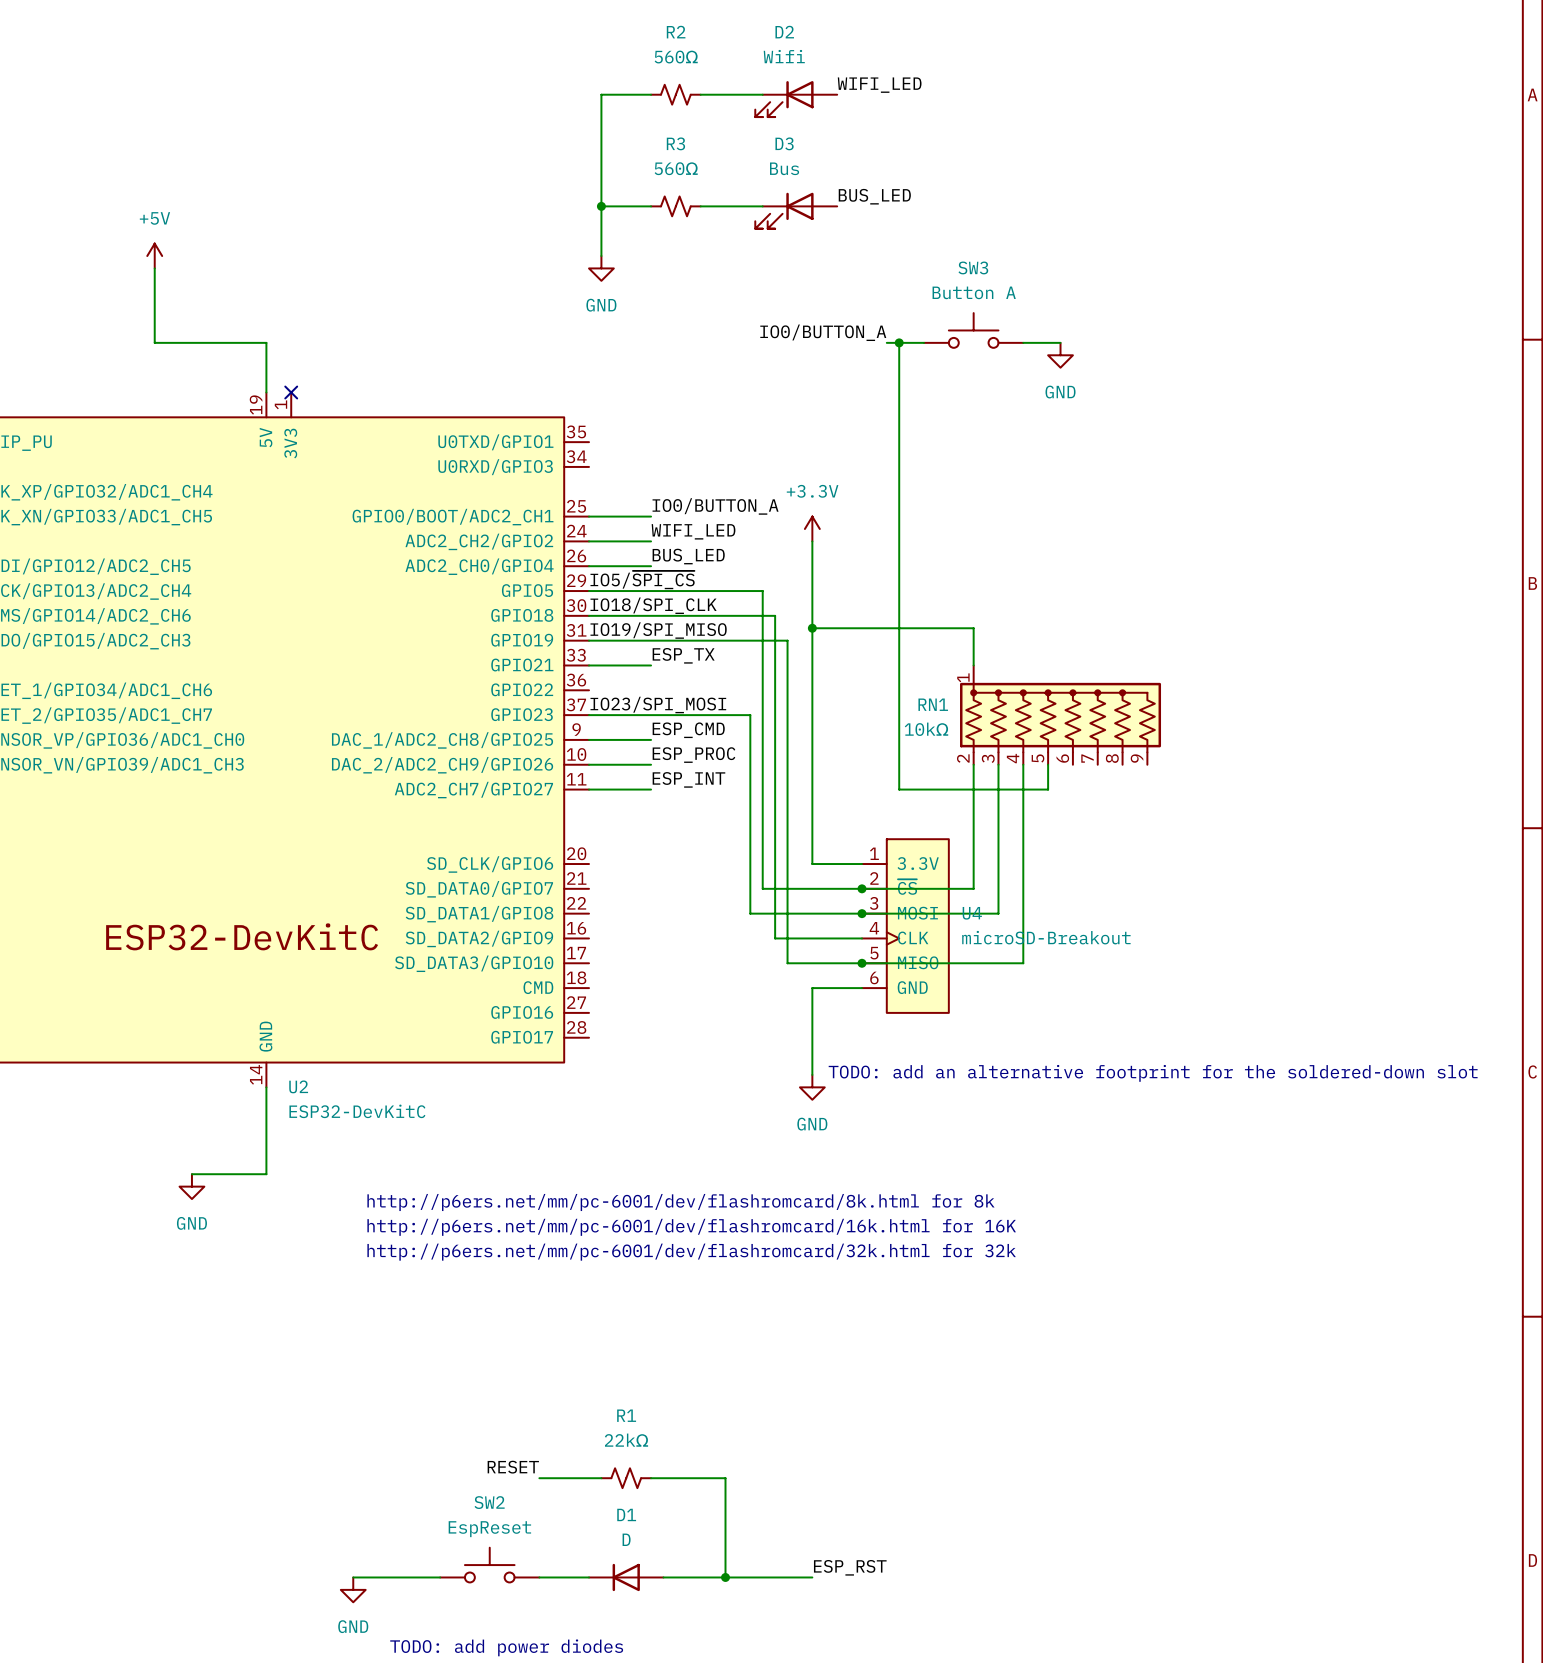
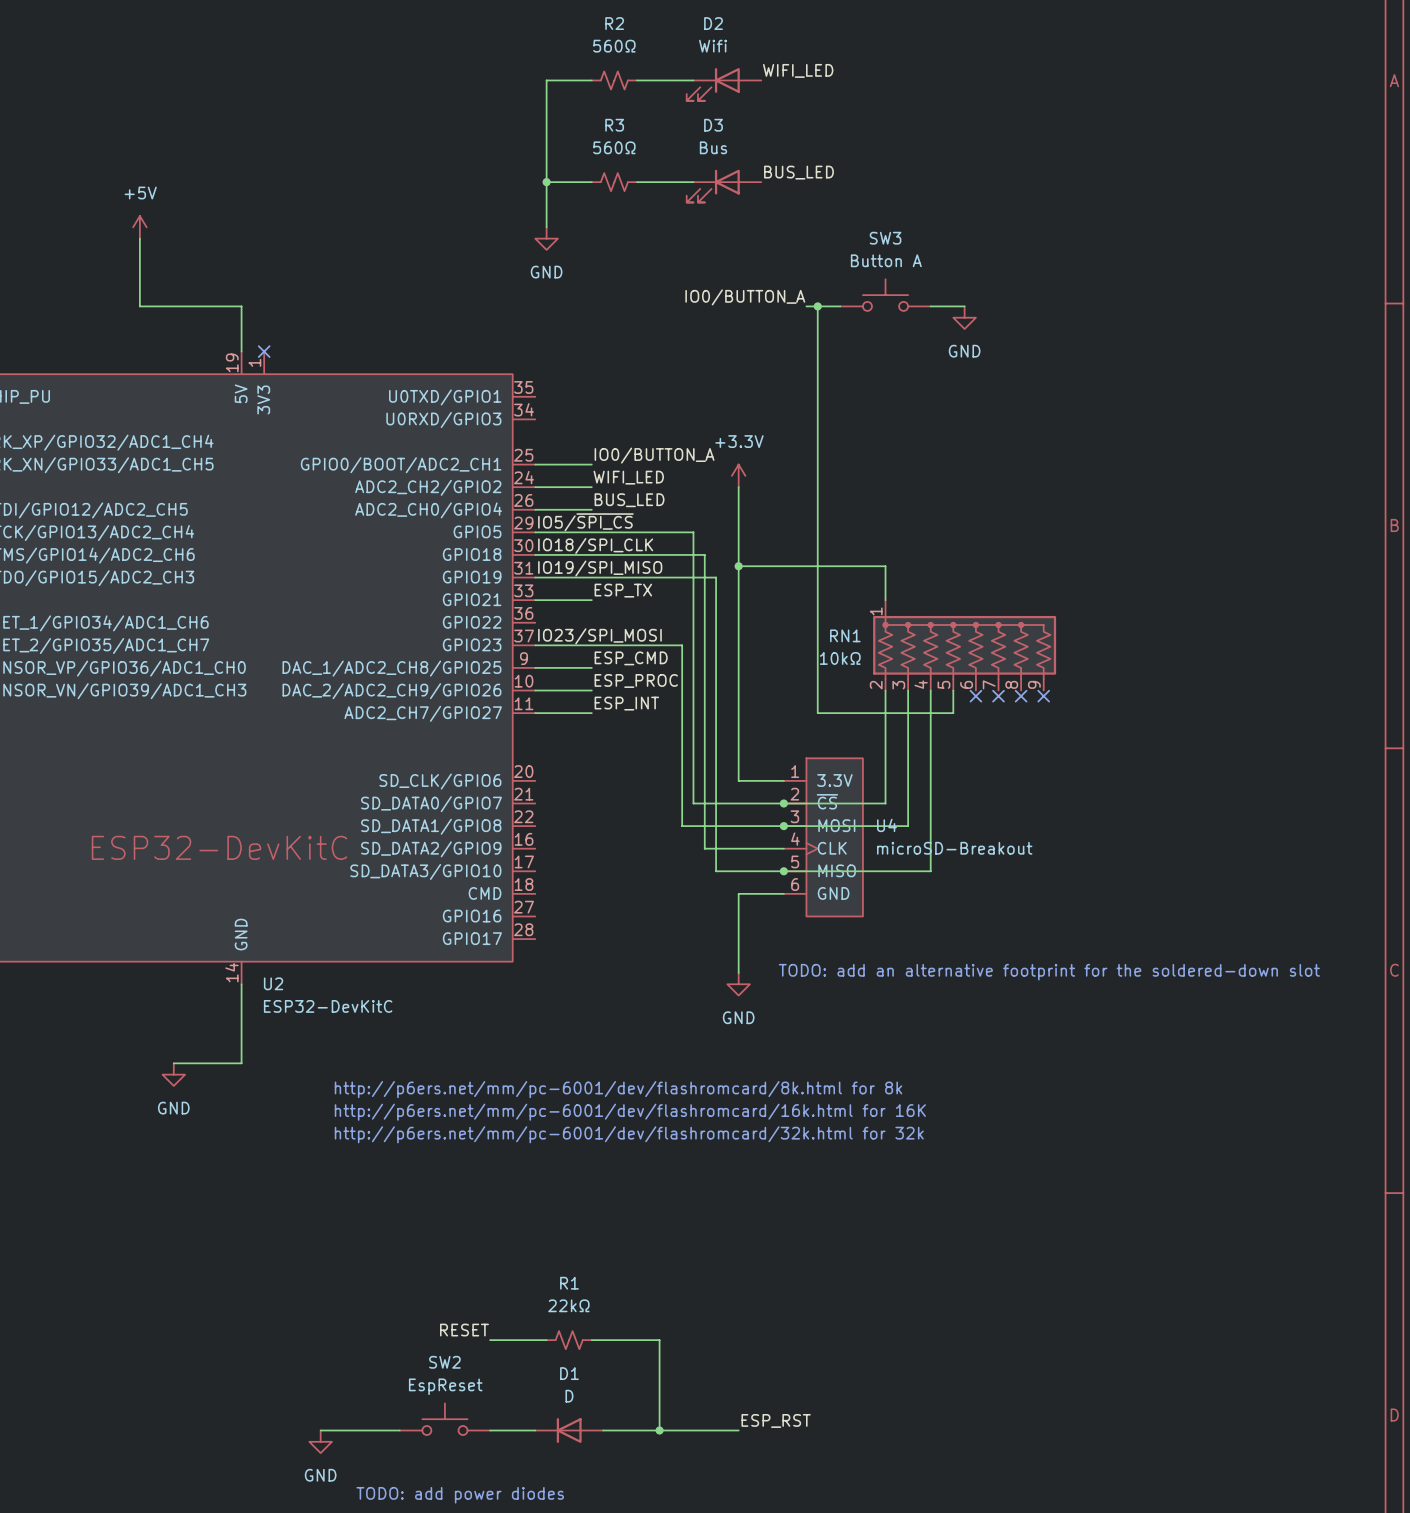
no-connect mark: none -> (975, 696)
no-connect mark: none -> (998, 696)
no-connect mark: none -> (1021, 696)
no-connect mark: none -> (1043, 696)

